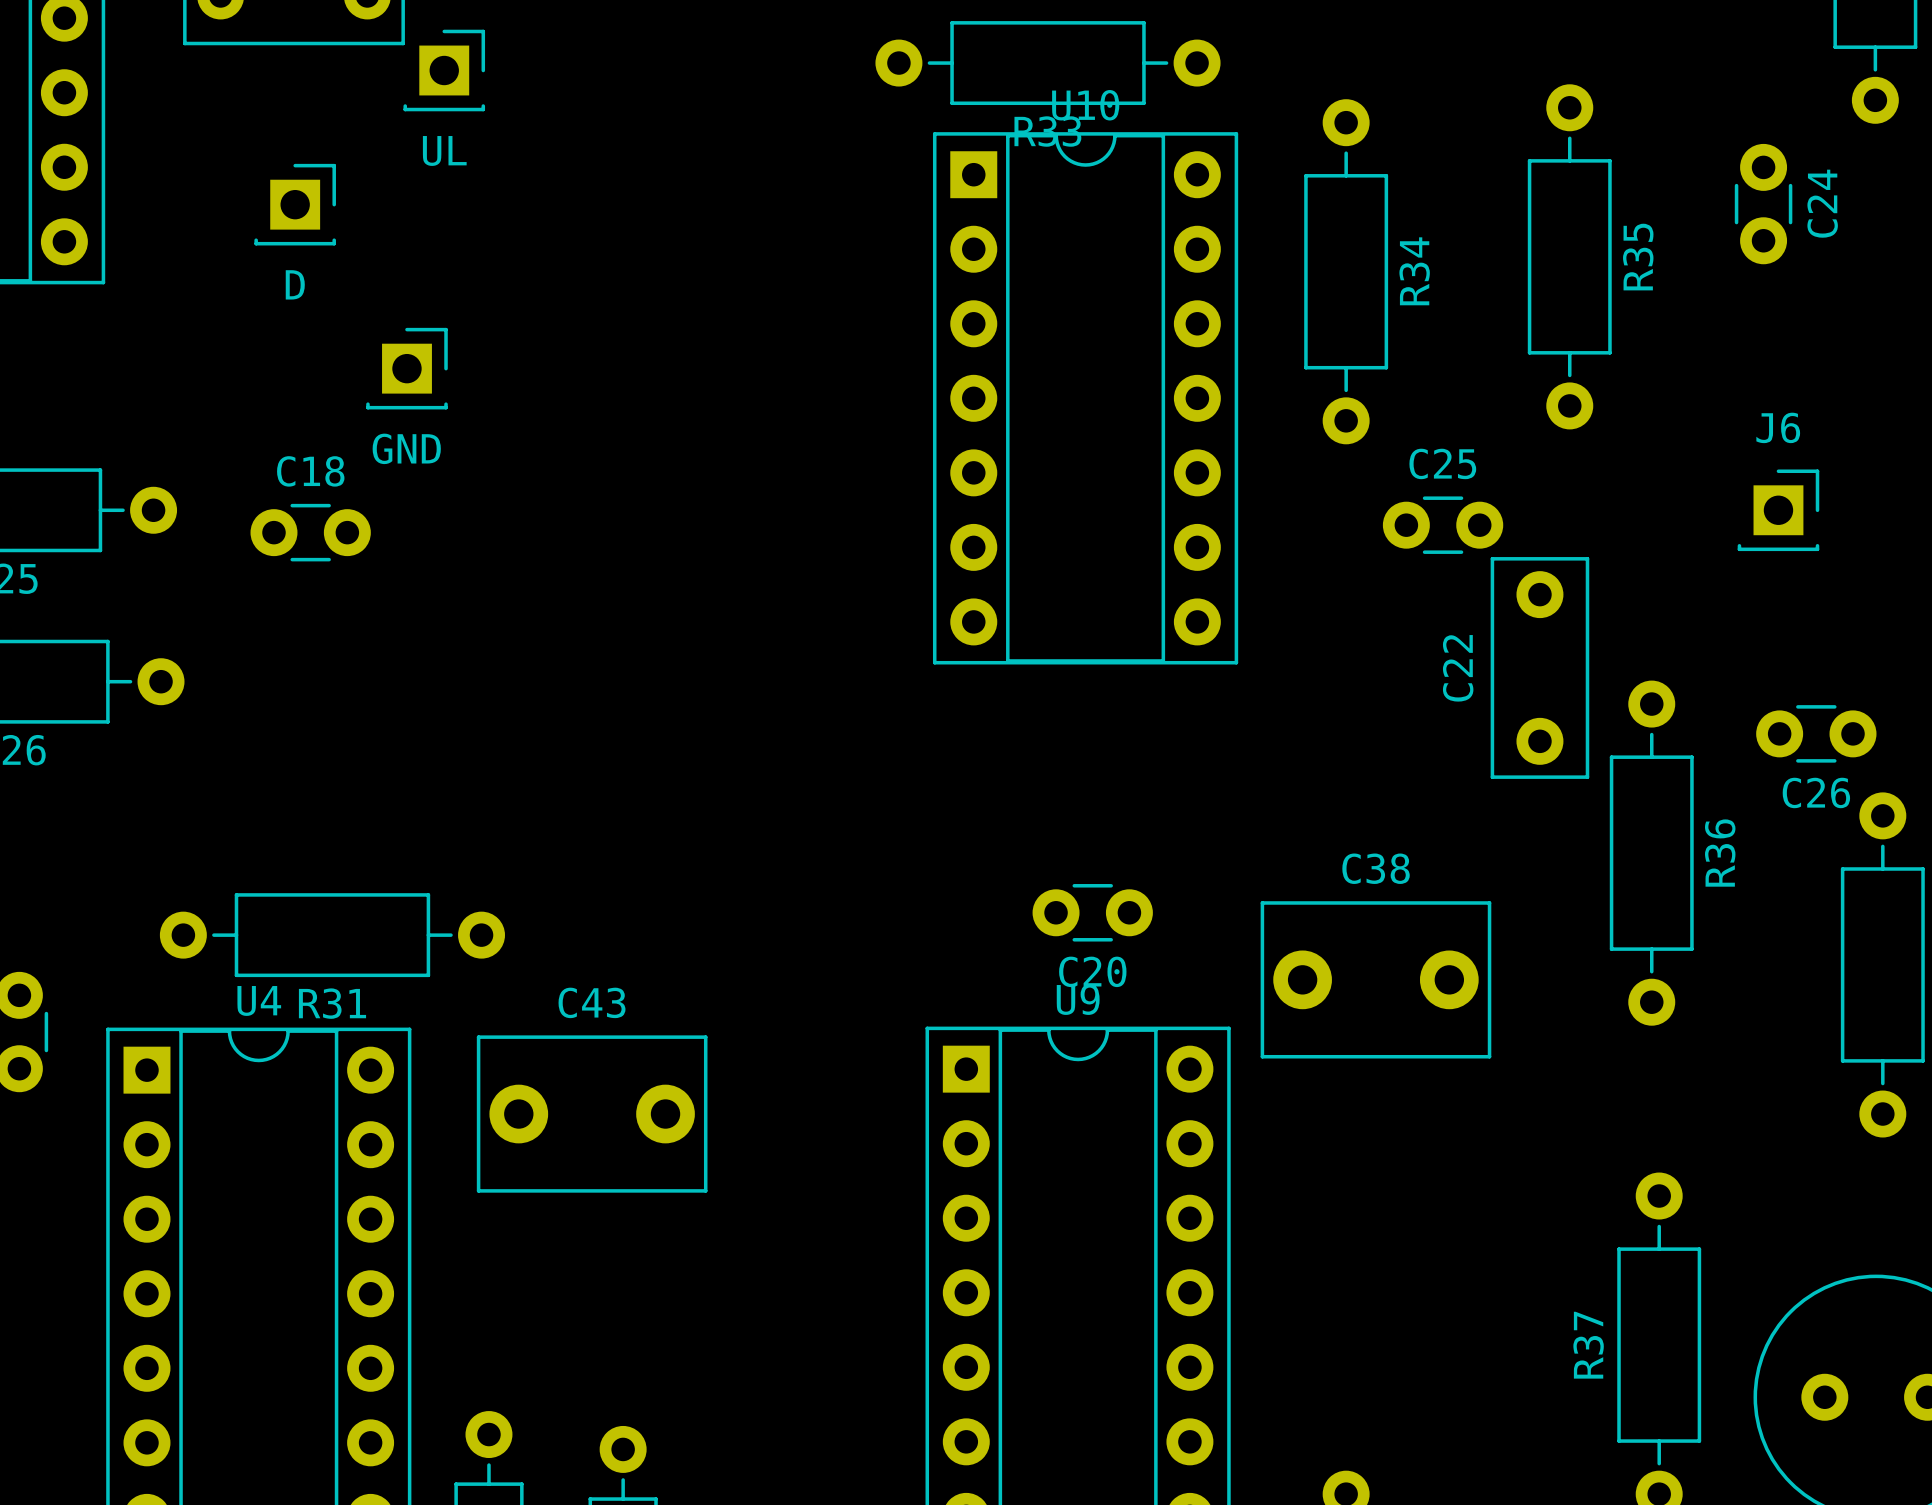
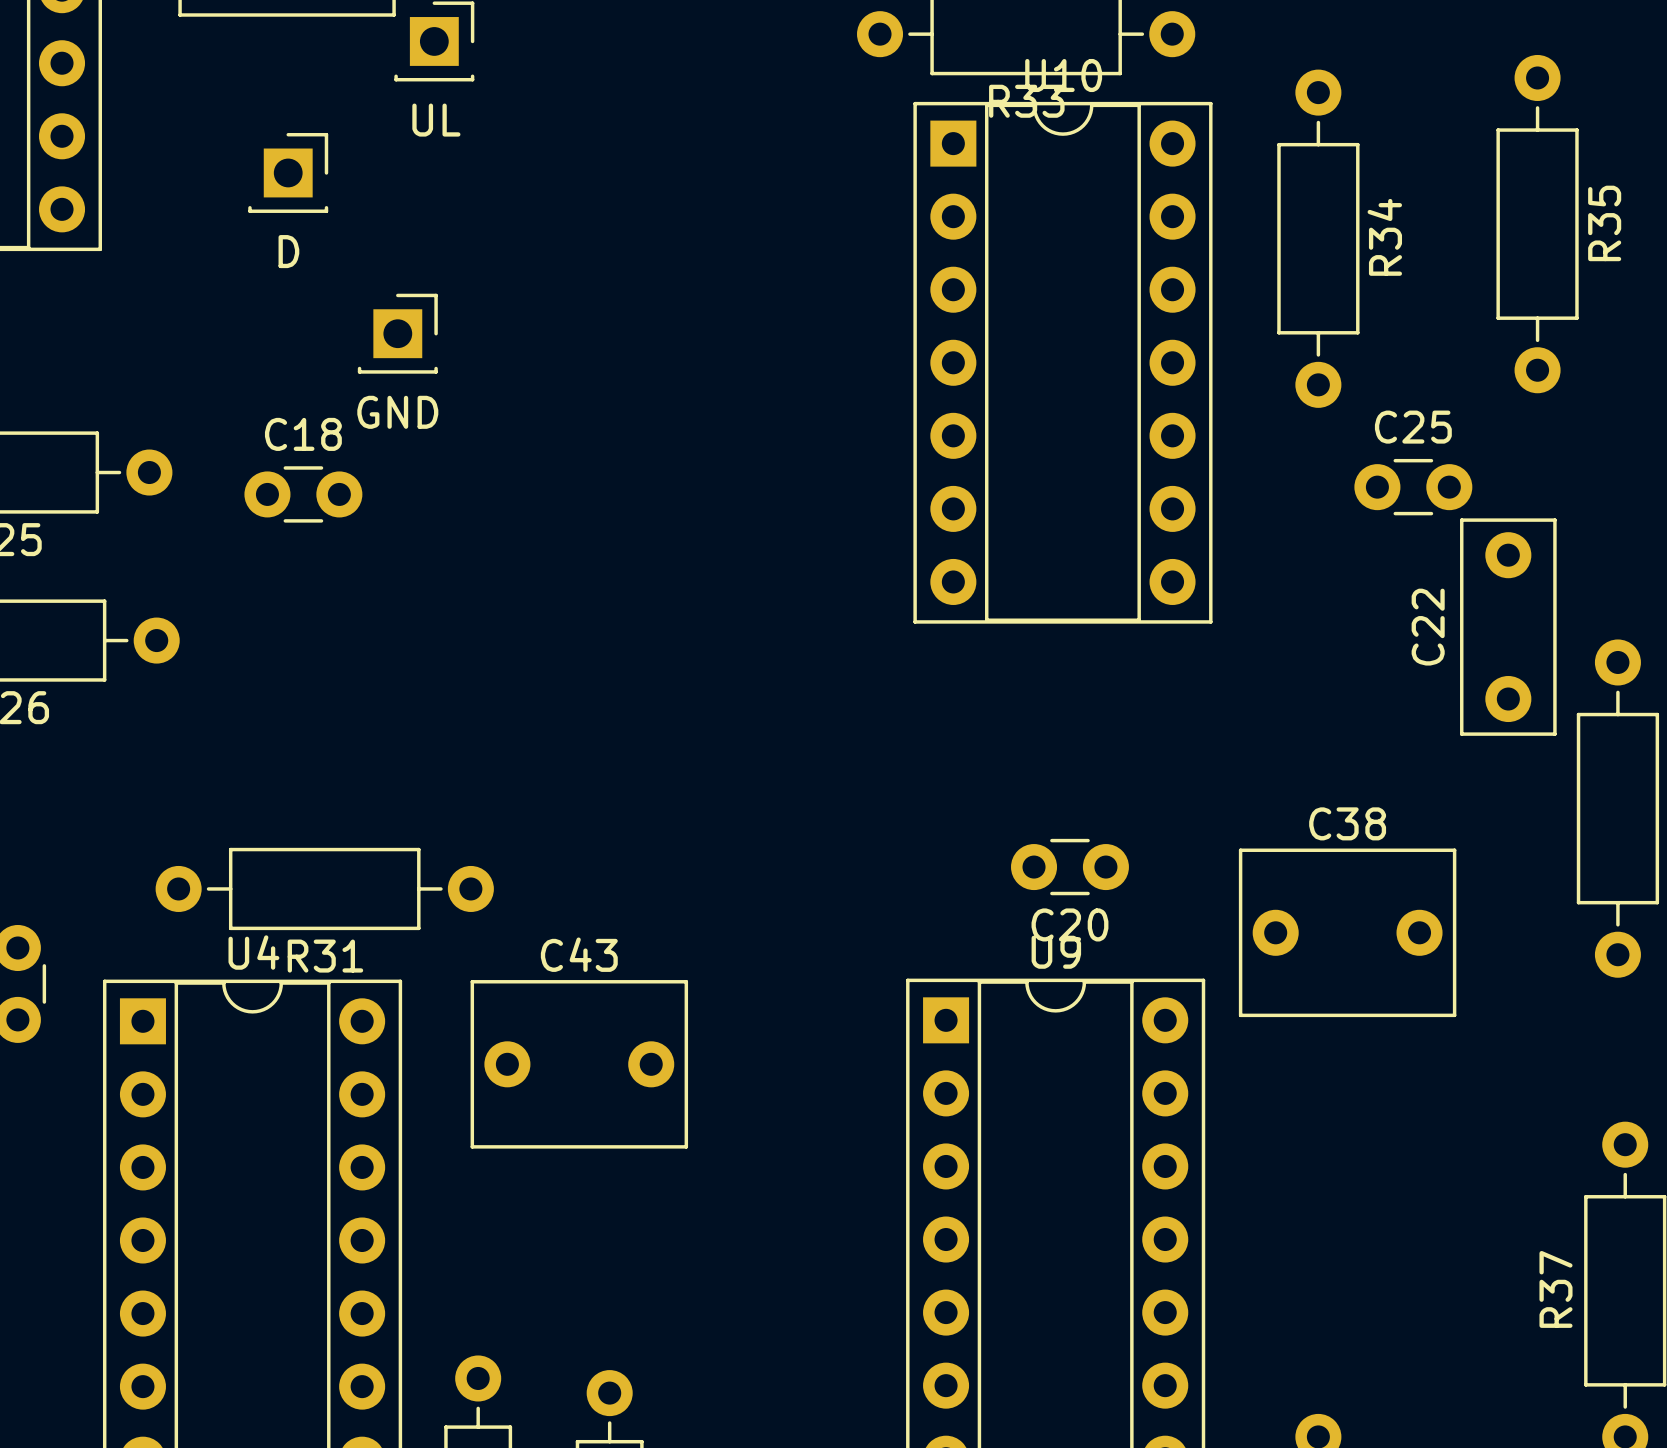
C38 footprint: [1260, 901, 1492, 1059] -> [1238, 848, 1457, 1018]
C43 footprint: [476, 1035, 708, 1193] -> [470, 980, 689, 1149]

